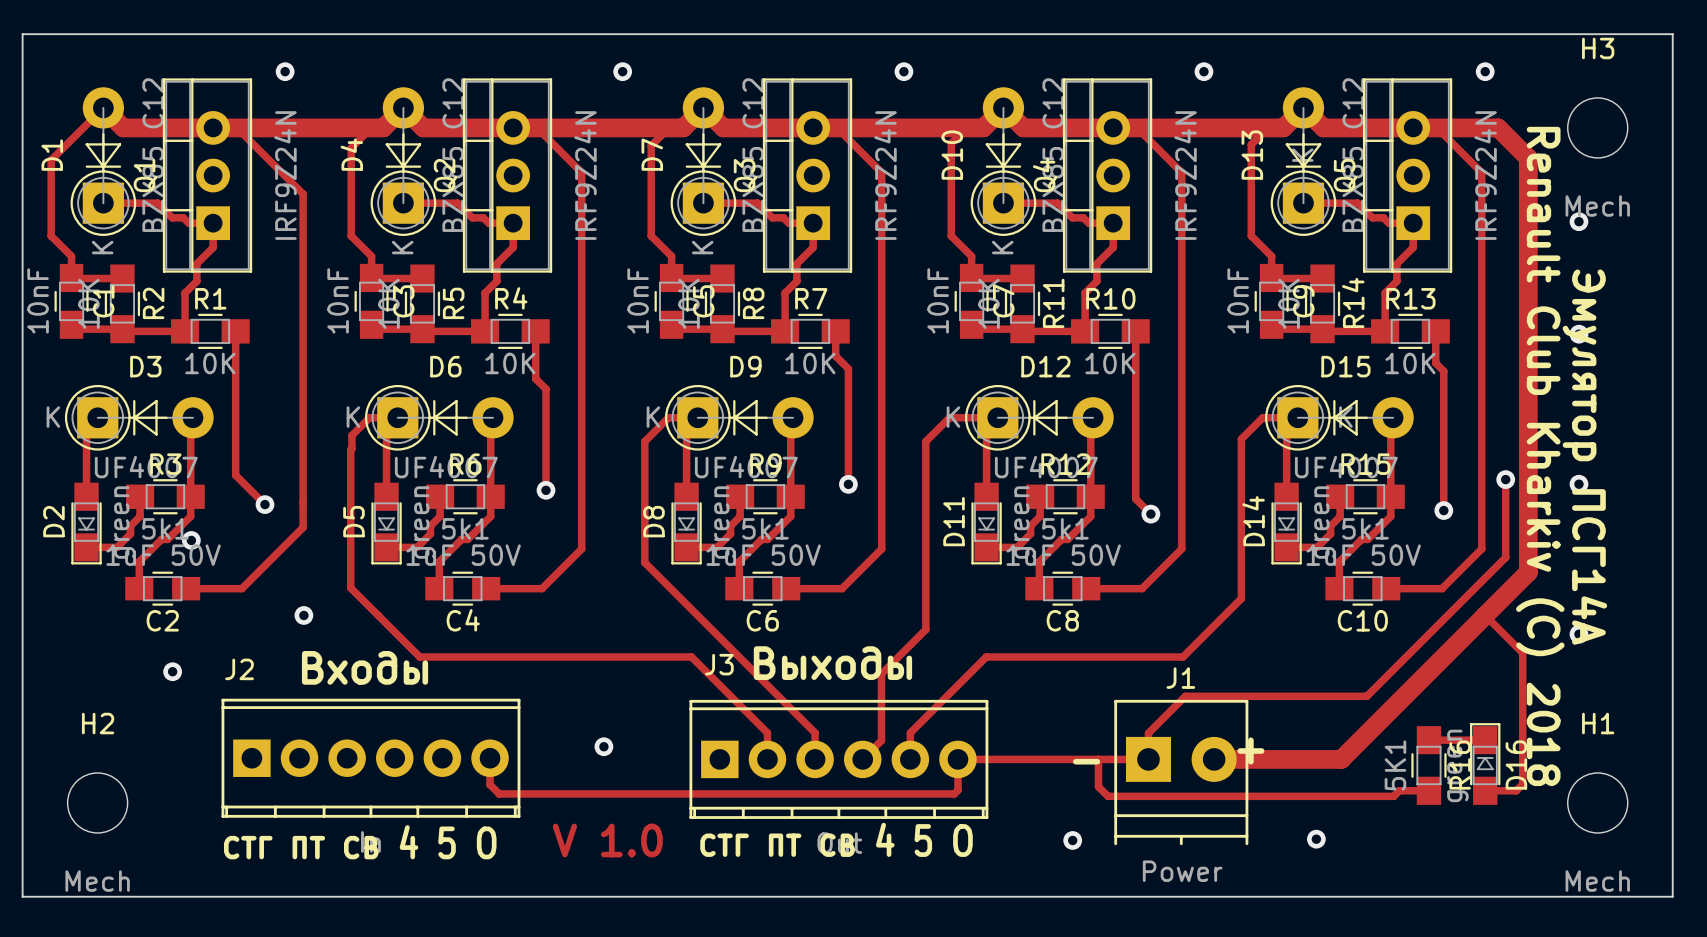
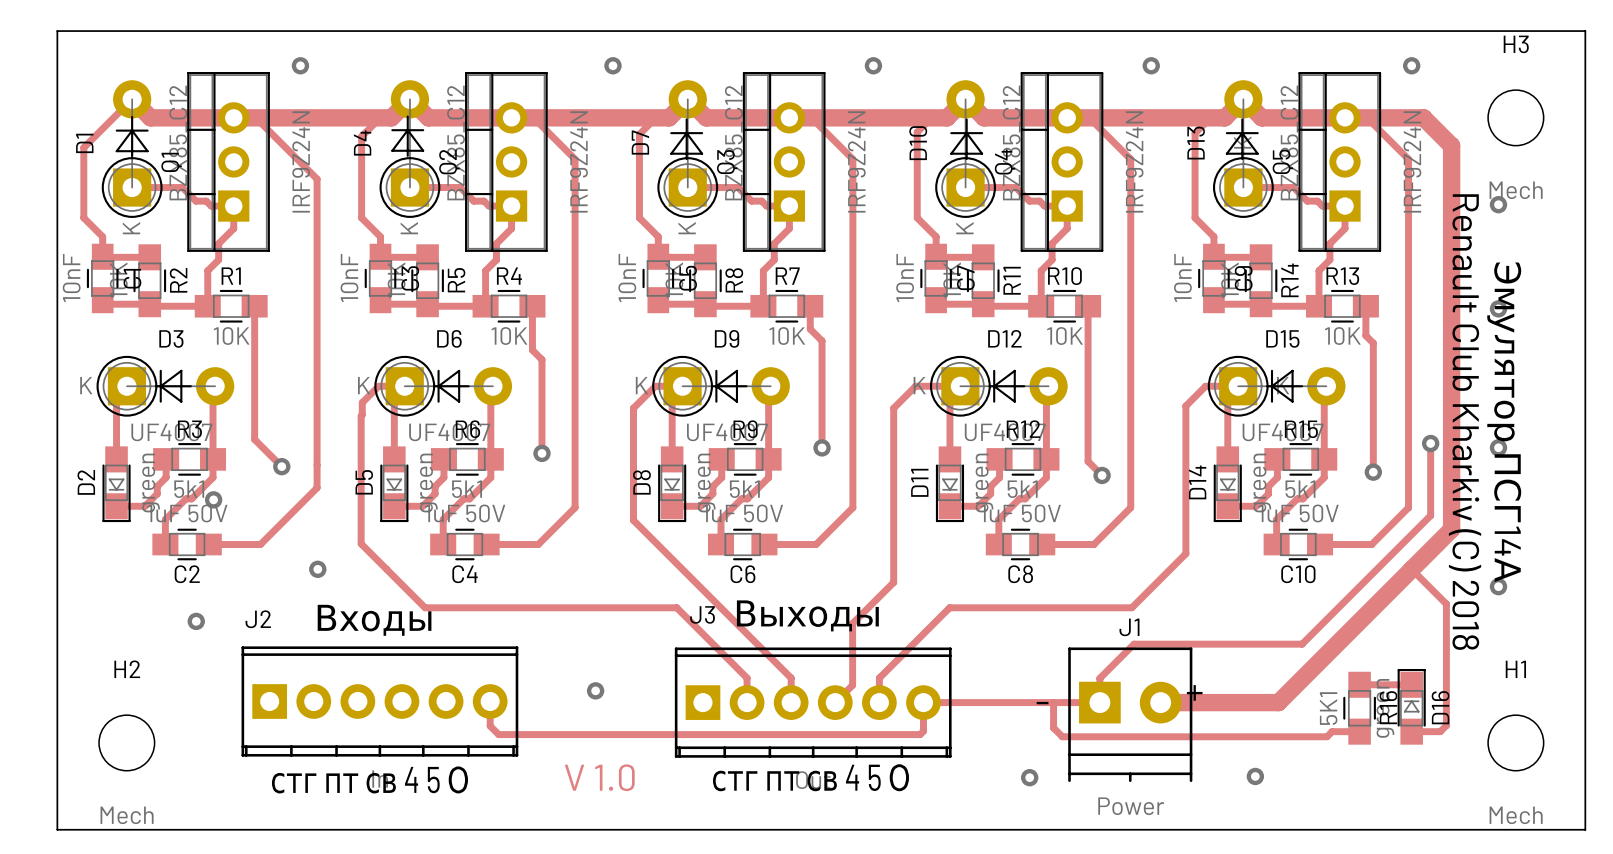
D1 footprint: [70, 87, 137, 236] -> [101, 80, 163, 218]
D4 footprint: [370, 87, 437, 236] -> [379, 80, 441, 218]
D7 footprint: [670, 87, 737, 236] -> [657, 80, 719, 218]
D10 footprint: [970, 87, 1037, 236] -> [935, 80, 996, 218]
D13 footprint: [1270, 87, 1337, 236] -> [1213, 80, 1274, 218]

